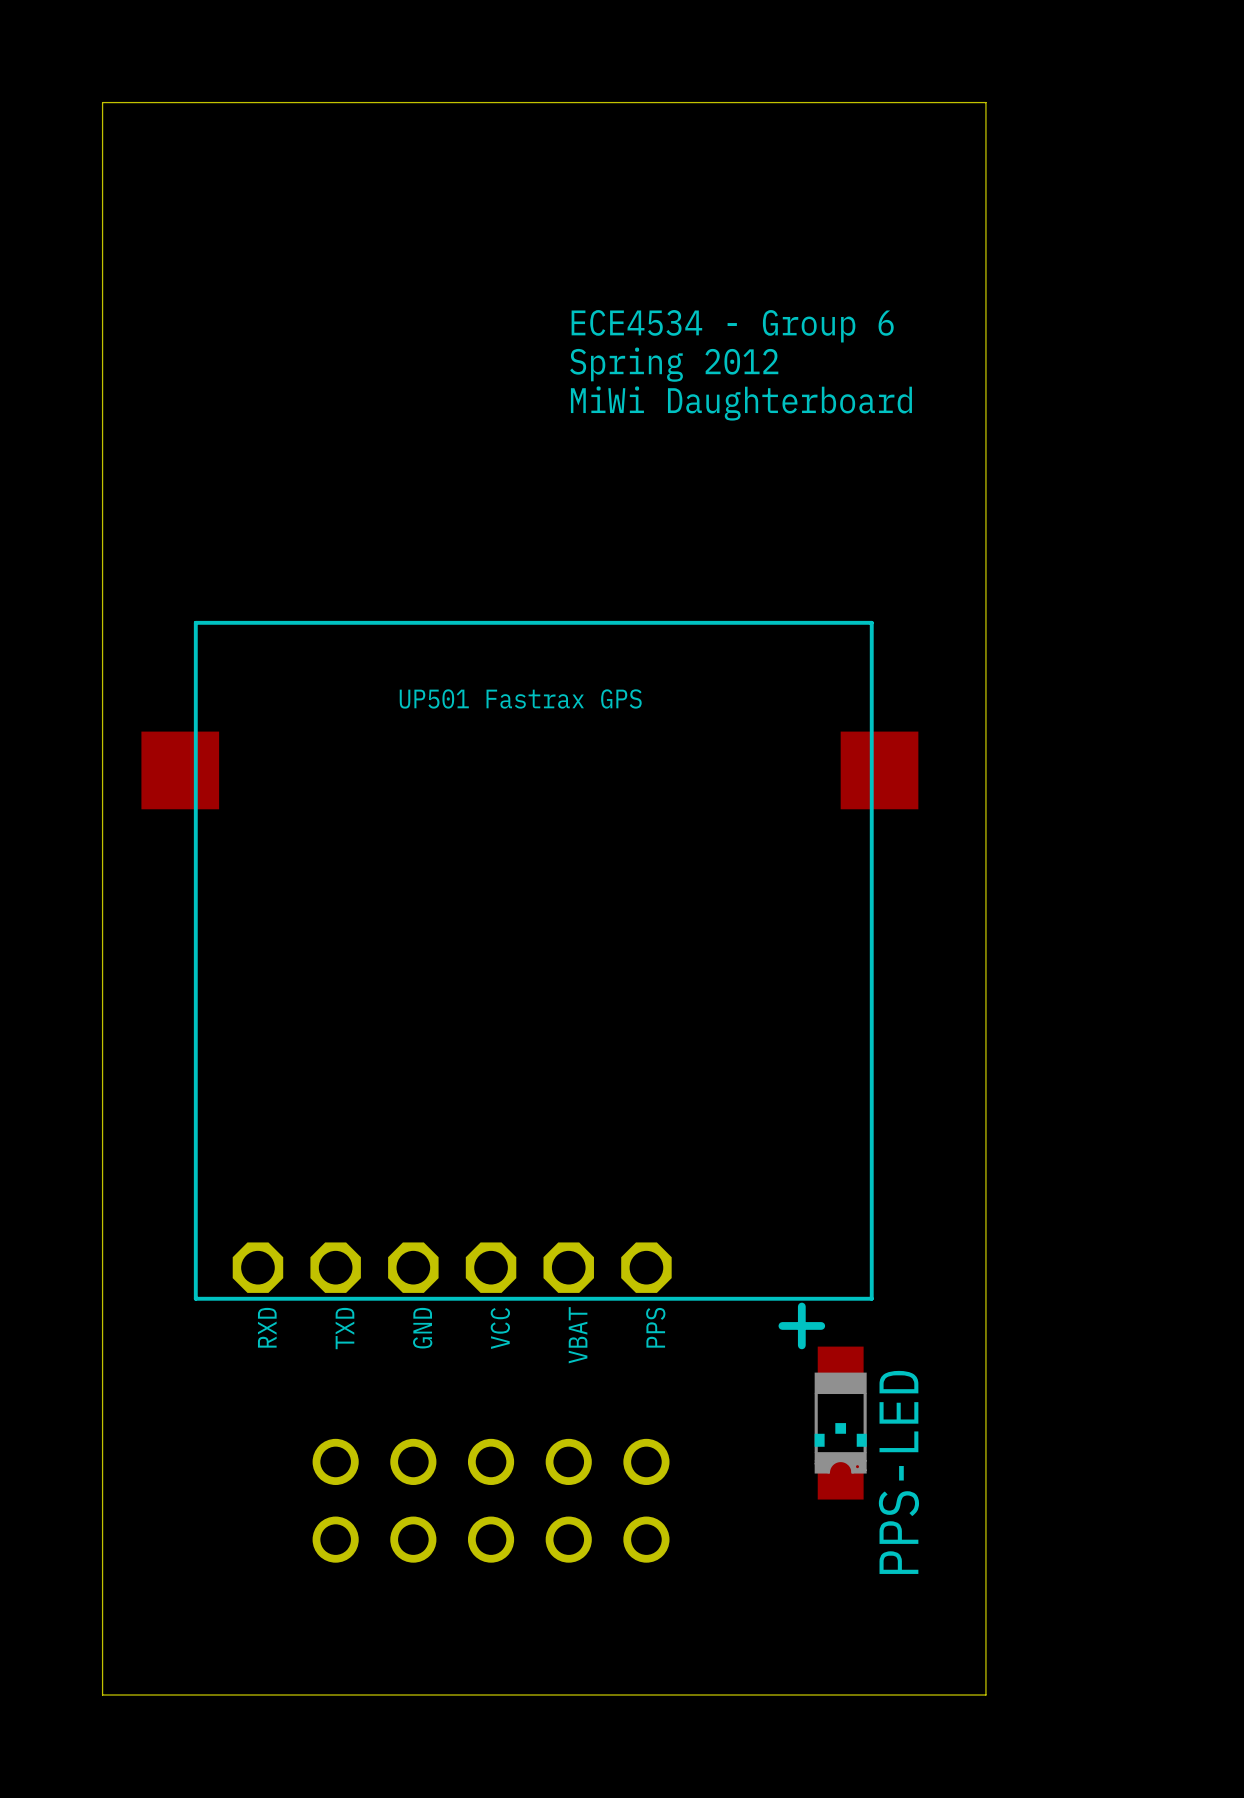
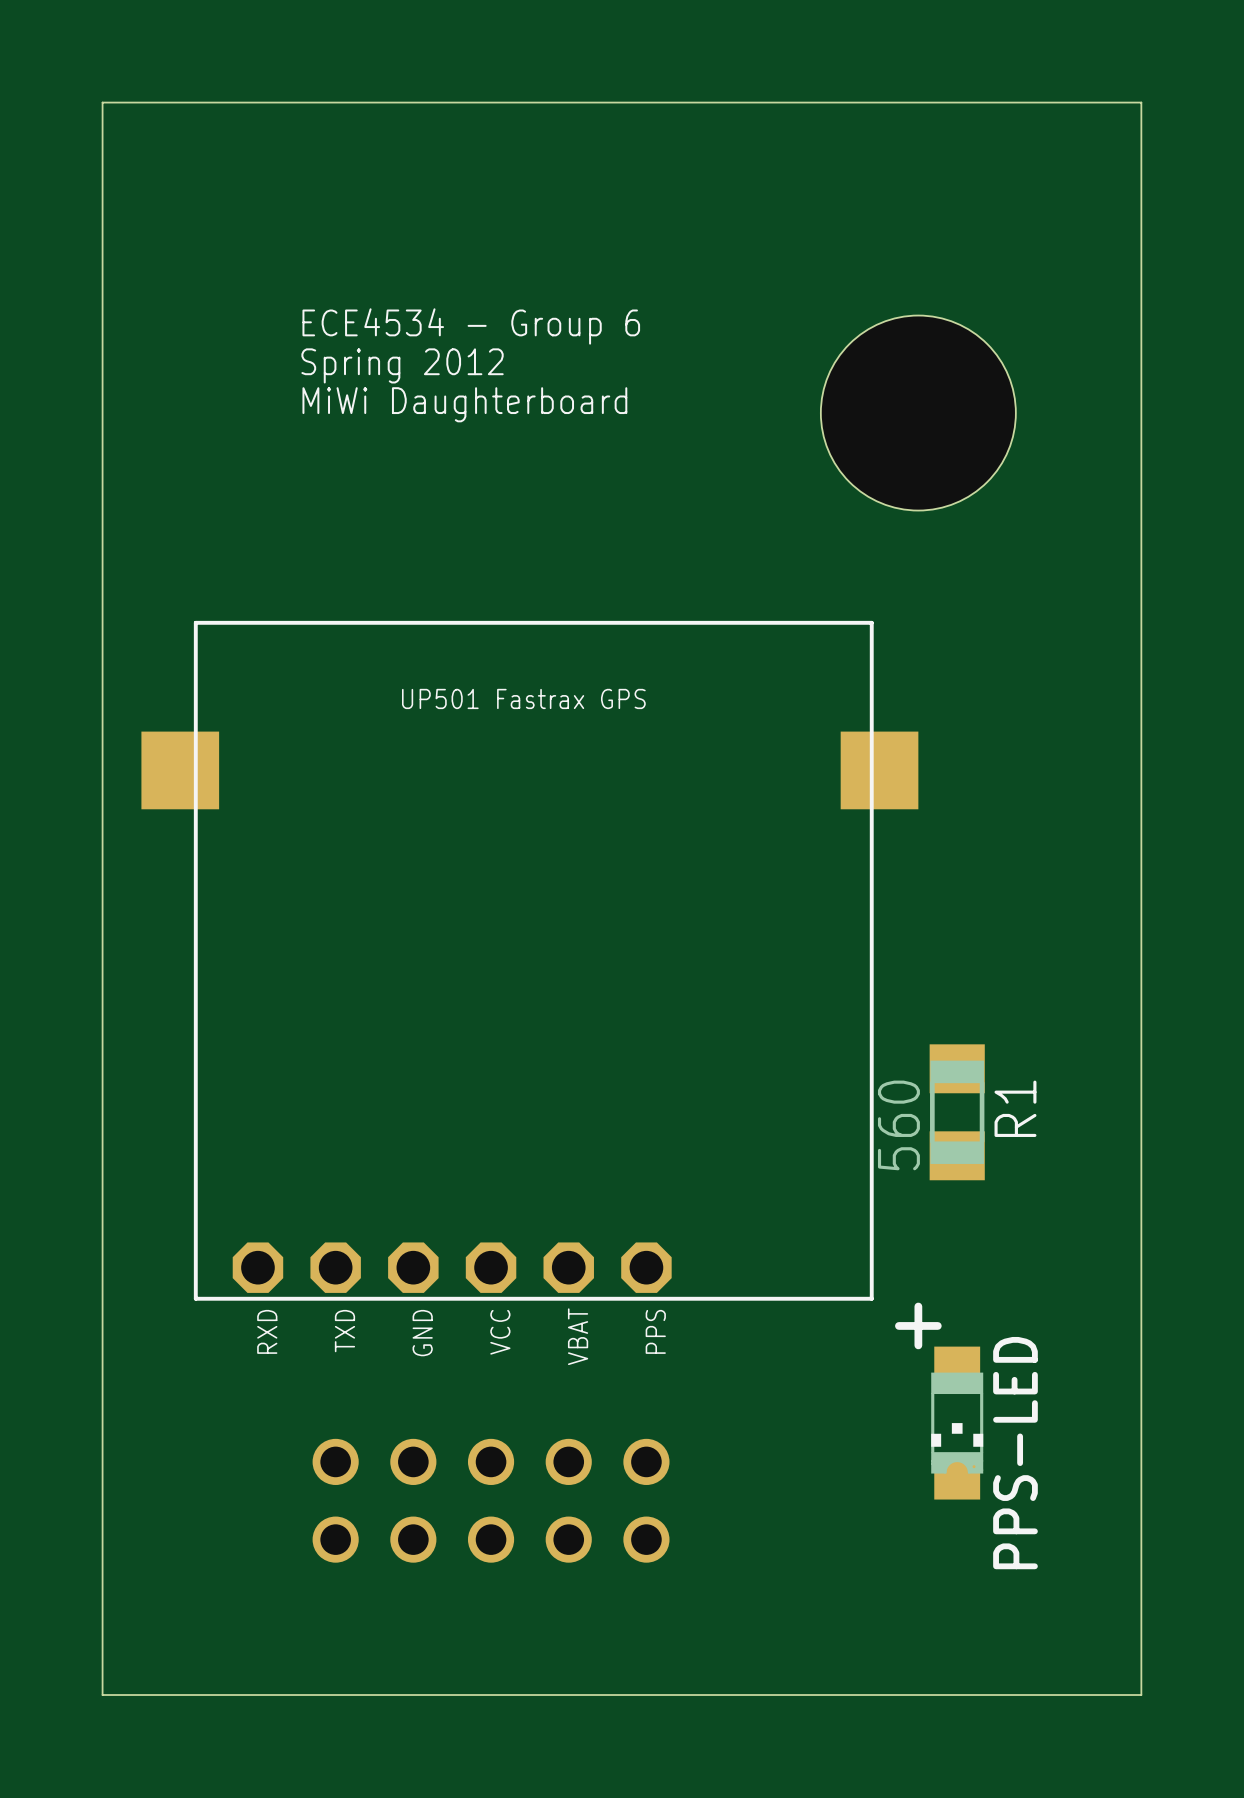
board edge: (985, 102) (985, 1695) -> (985, 102) (1141, 102) (1141, 1695) (985, 1695)
text position: ECE4534 - Group 6 (732, 326) -> ECE4534 - Group 6 (471, 326)
text position: Spring 2012 (674, 364) -> Spring 2012 (402, 365)
text position: MiWi Daughterboard (741, 403) -> MiWi Daughterboard (464, 404)
hole: none -> (918, 413)
R1: none -> 560 (957, 1112)
PPS-LED position: (822, 1401) -> (939, 1401)

